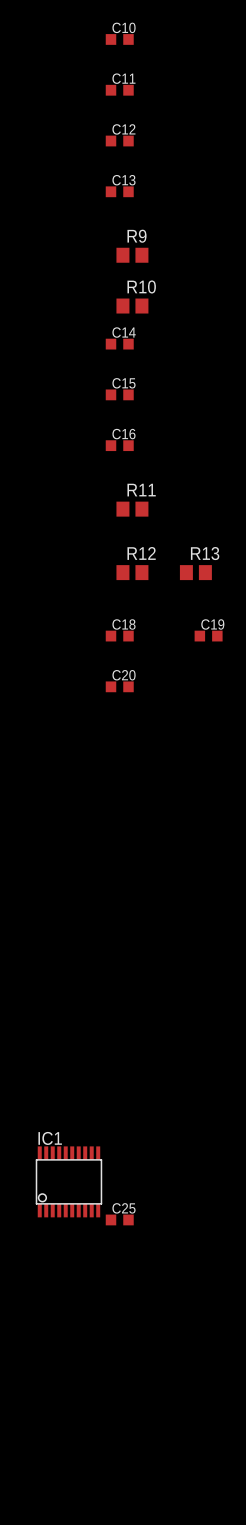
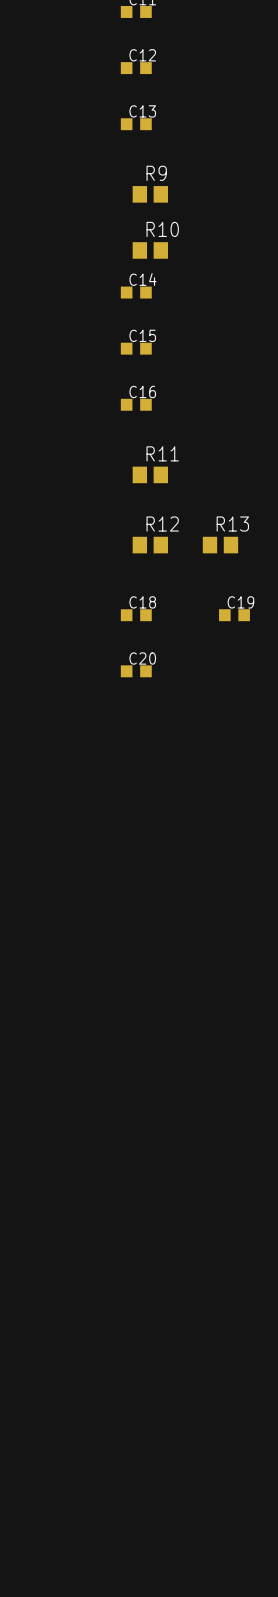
IC1: (68, 1181) -> none
C25: (119, 1219) -> none

